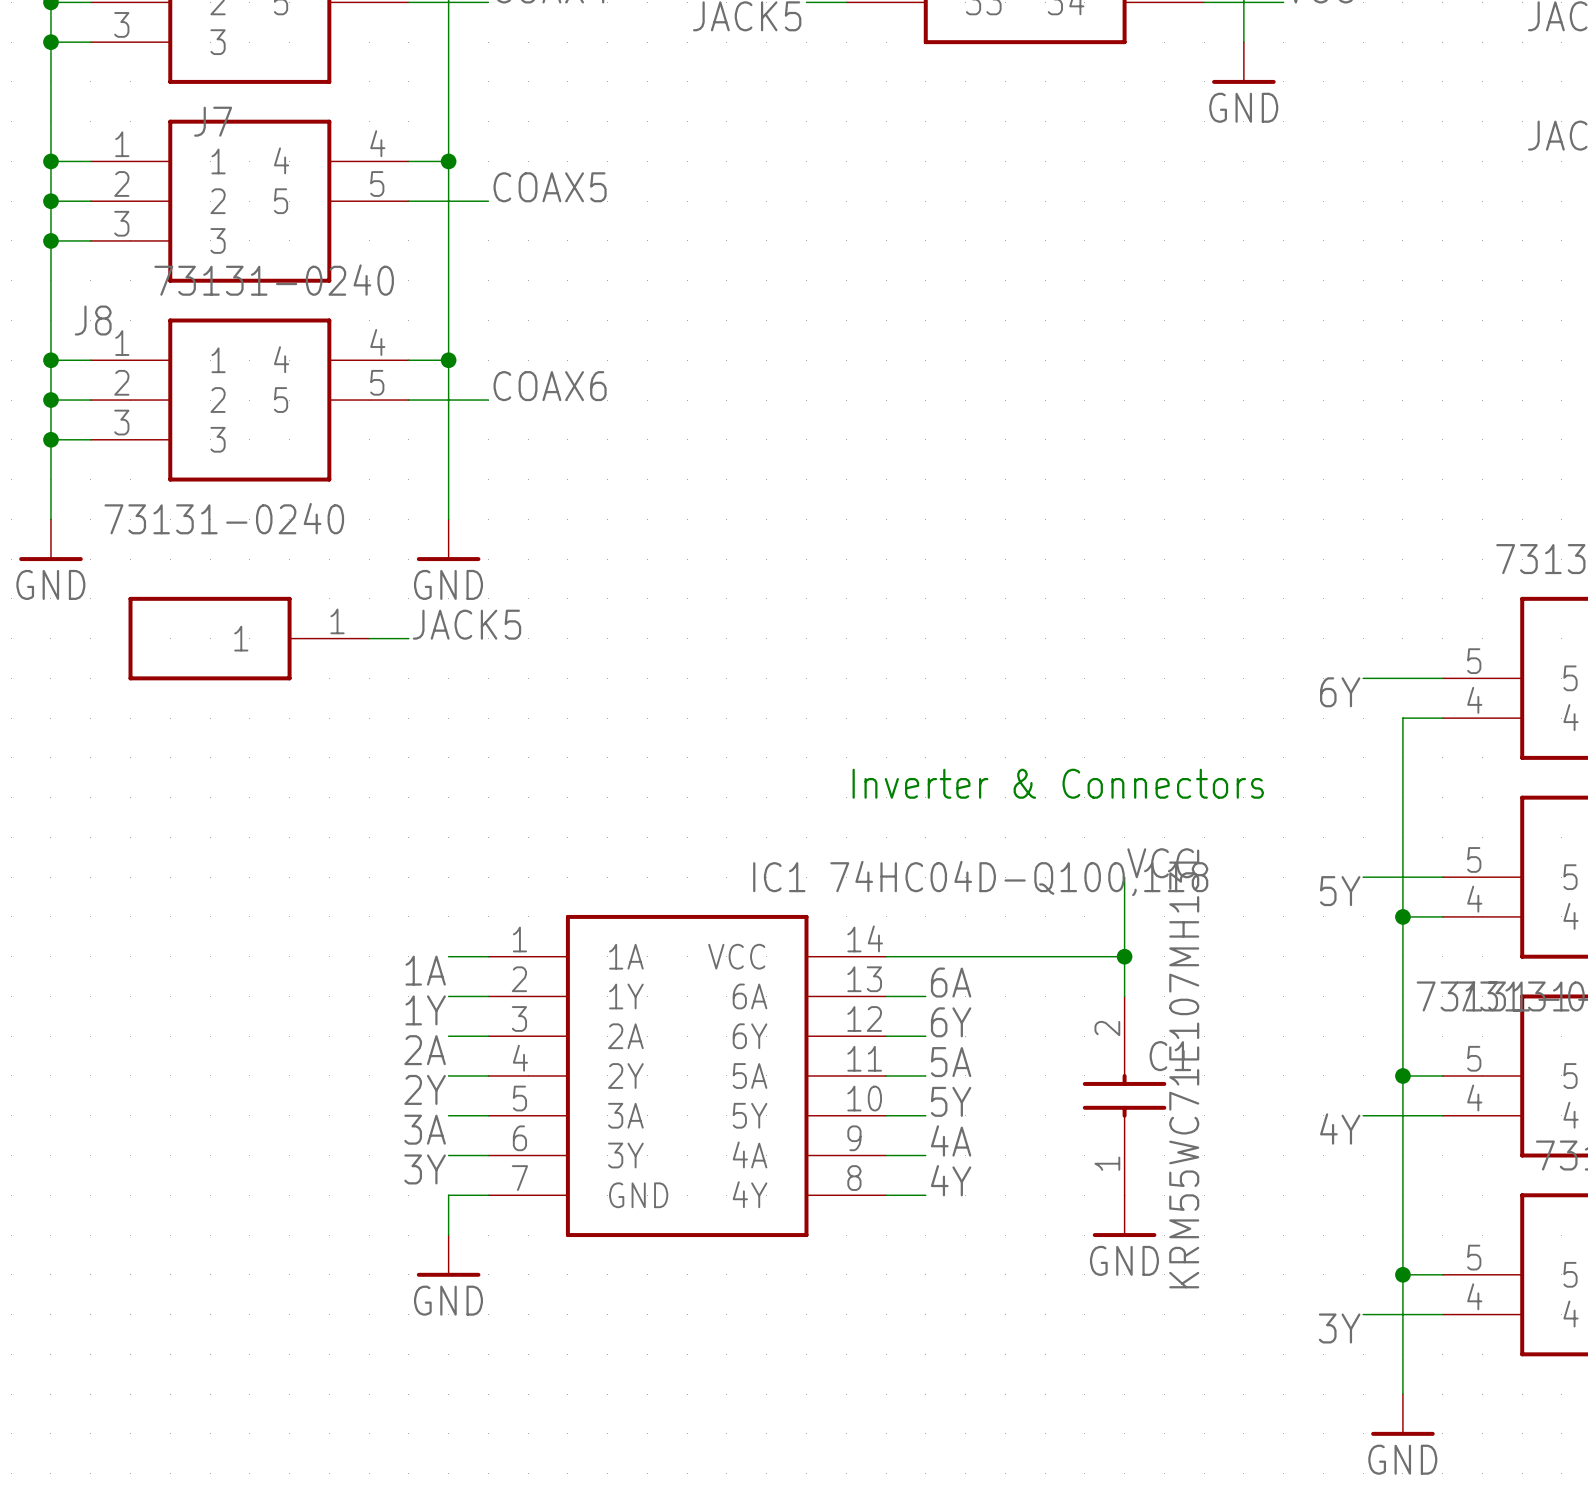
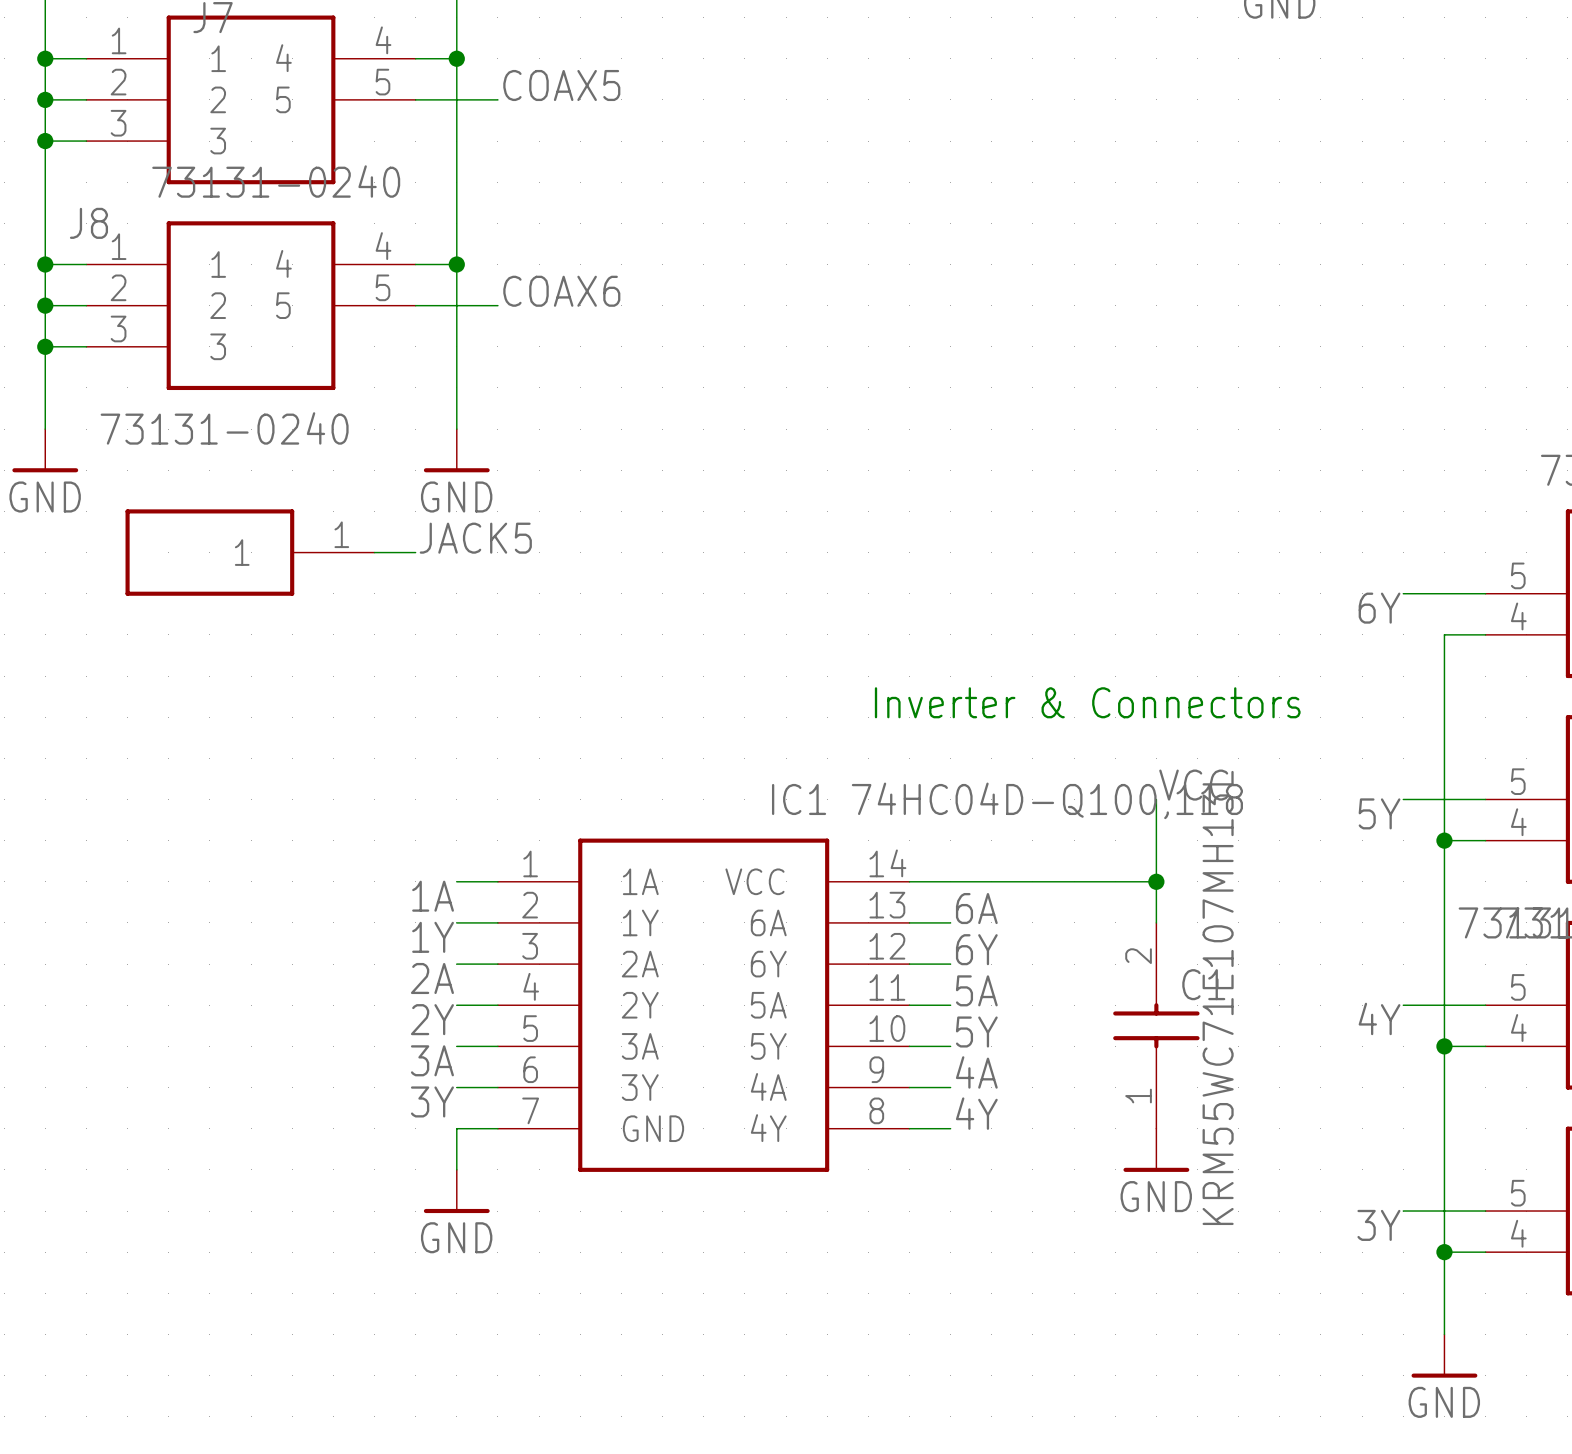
junction position: (1402, 1075) -> (1444, 1046)
wire: (1363, 1115) (1402, 1115) -> (1403, 1005) (1444, 1005)
label position: 4Y (1340, 1129) -> 4Y (1379, 1018)
junction position: (1402, 1274) -> (1444, 1252)
wire: (1363, 1314) (1402, 1314) -> (1403, 1211) (1444, 1211)
label position: 3Y (1339, 1328) -> 3Y (1378, 1225)

